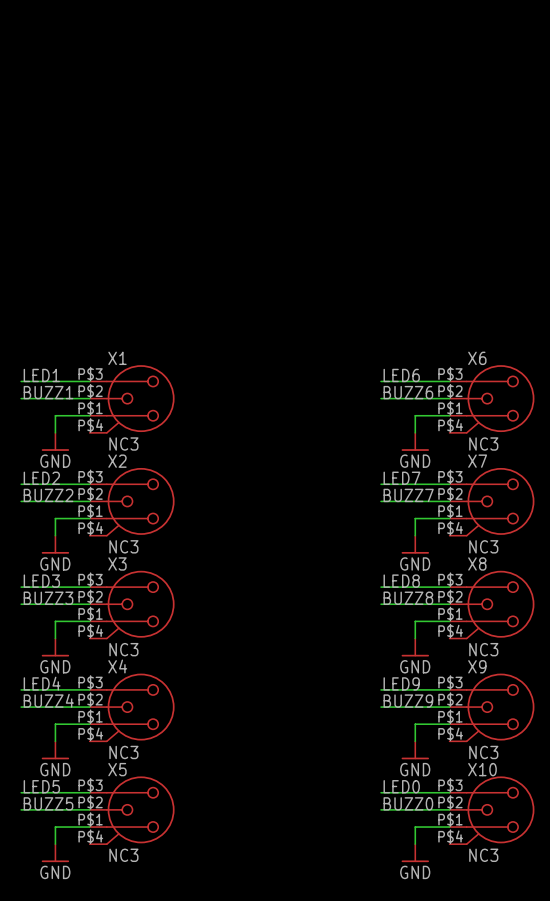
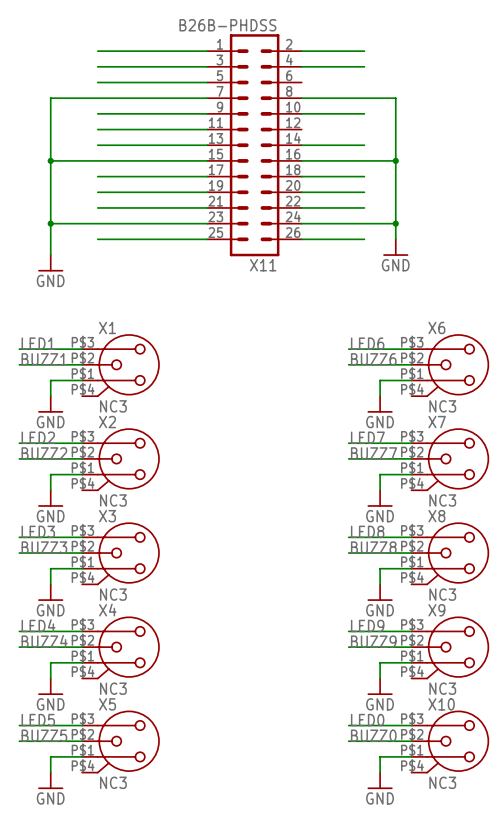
wire: none -> (97, 51) (207, 51)
wire: none -> (301, 51) (364, 51)
wire: none -> (97, 66) (207, 66)
wire: none -> (301, 66) (364, 66)
wire: none -> (97, 82) (207, 82)
wire: none -> (207, 98) (50, 98) (50, 255)
wire: none -> (301, 98) (395, 98) (395, 239)
wire: none -> (97, 113) (207, 113)
wire: none -> (301, 113) (364, 113)
wire: none -> (97, 129) (207, 129)
wire: none -> (97, 145) (207, 145)
X11: none -> B26B-PHDSS (254, 145)
wire: none -> (301, 145) (364, 145)
wire: none -> (50, 160) (207, 160)
junction: none -> (50, 160)
wire: none -> (301, 160) (395, 160)
junction: none -> (395, 160)
wire: none -> (97, 176) (207, 176)
wire: none -> (301, 176) (364, 176)
wire: none -> (97, 192) (207, 192)
wire: none -> (301, 192) (364, 192)
wire: none -> (97, 207) (207, 207)
wire: none -> (301, 207) (364, 207)
wire: none -> (50, 223) (207, 223)
junction: none -> (50, 223)
wire: none -> (301, 223) (395, 223)
junction: none -> (395, 223)
wire: none -> (97, 239) (207, 239)
wire: none -> (301, 239) (364, 239)
power symbol: none -> GND (395, 247)
power symbol: none -> GND (50, 263)

